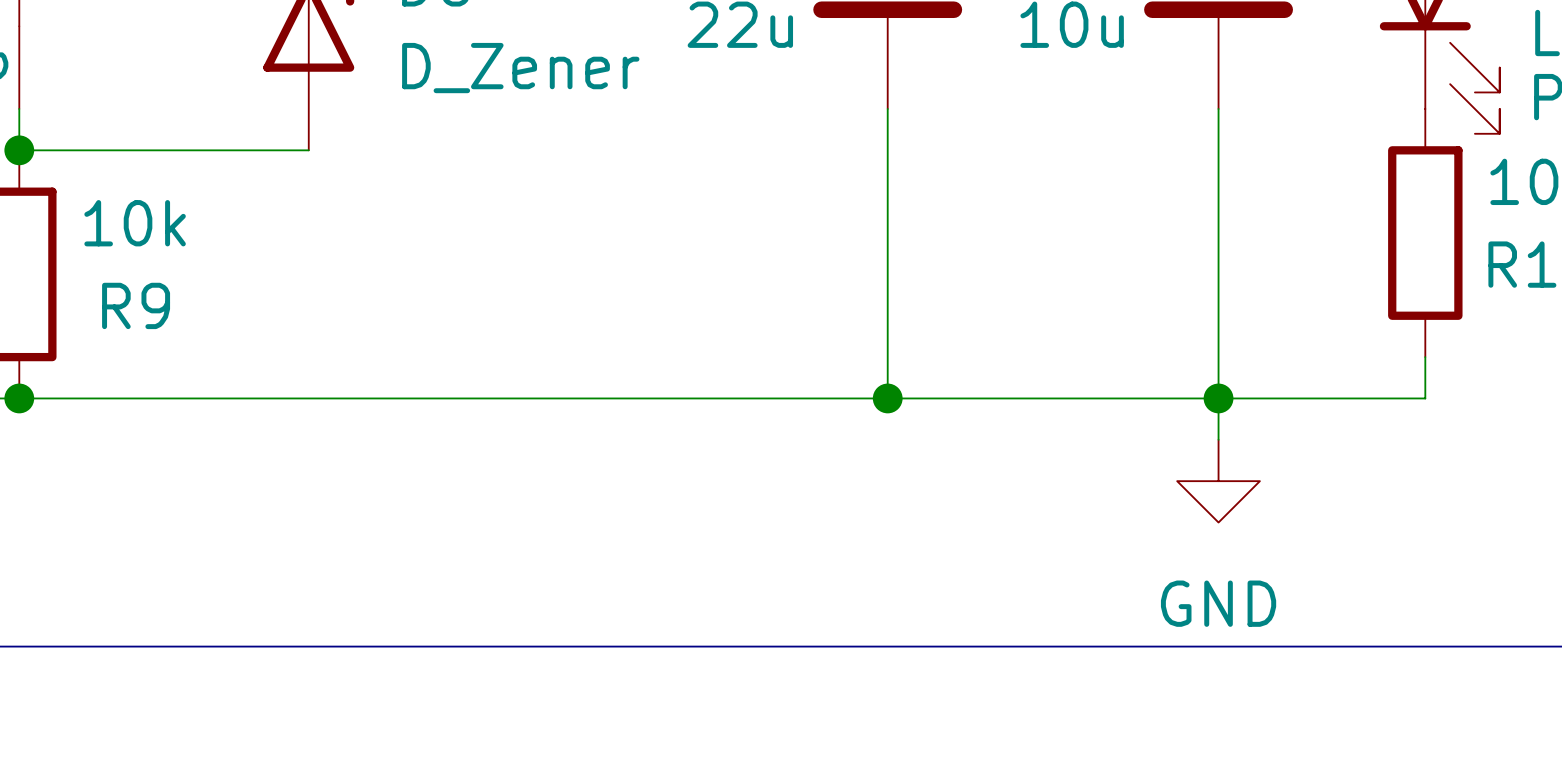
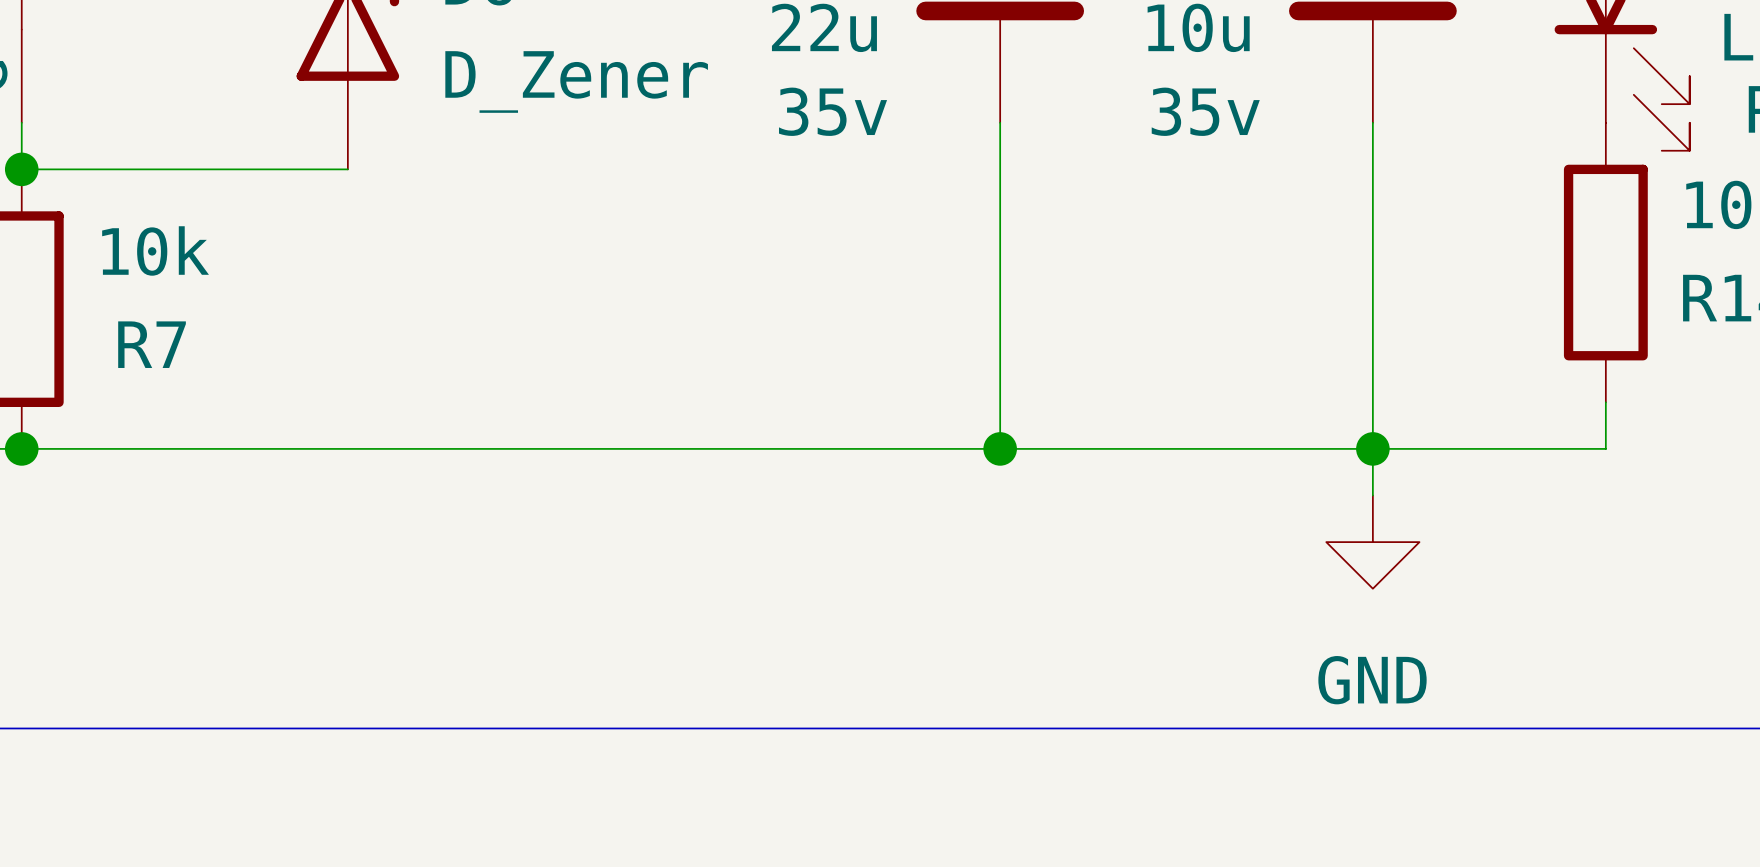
part text: none -> 35v (833, 111)
part text: none -> 35v (1205, 111)
R9 name: R9 (136, 305) -> R7 (152, 344)

